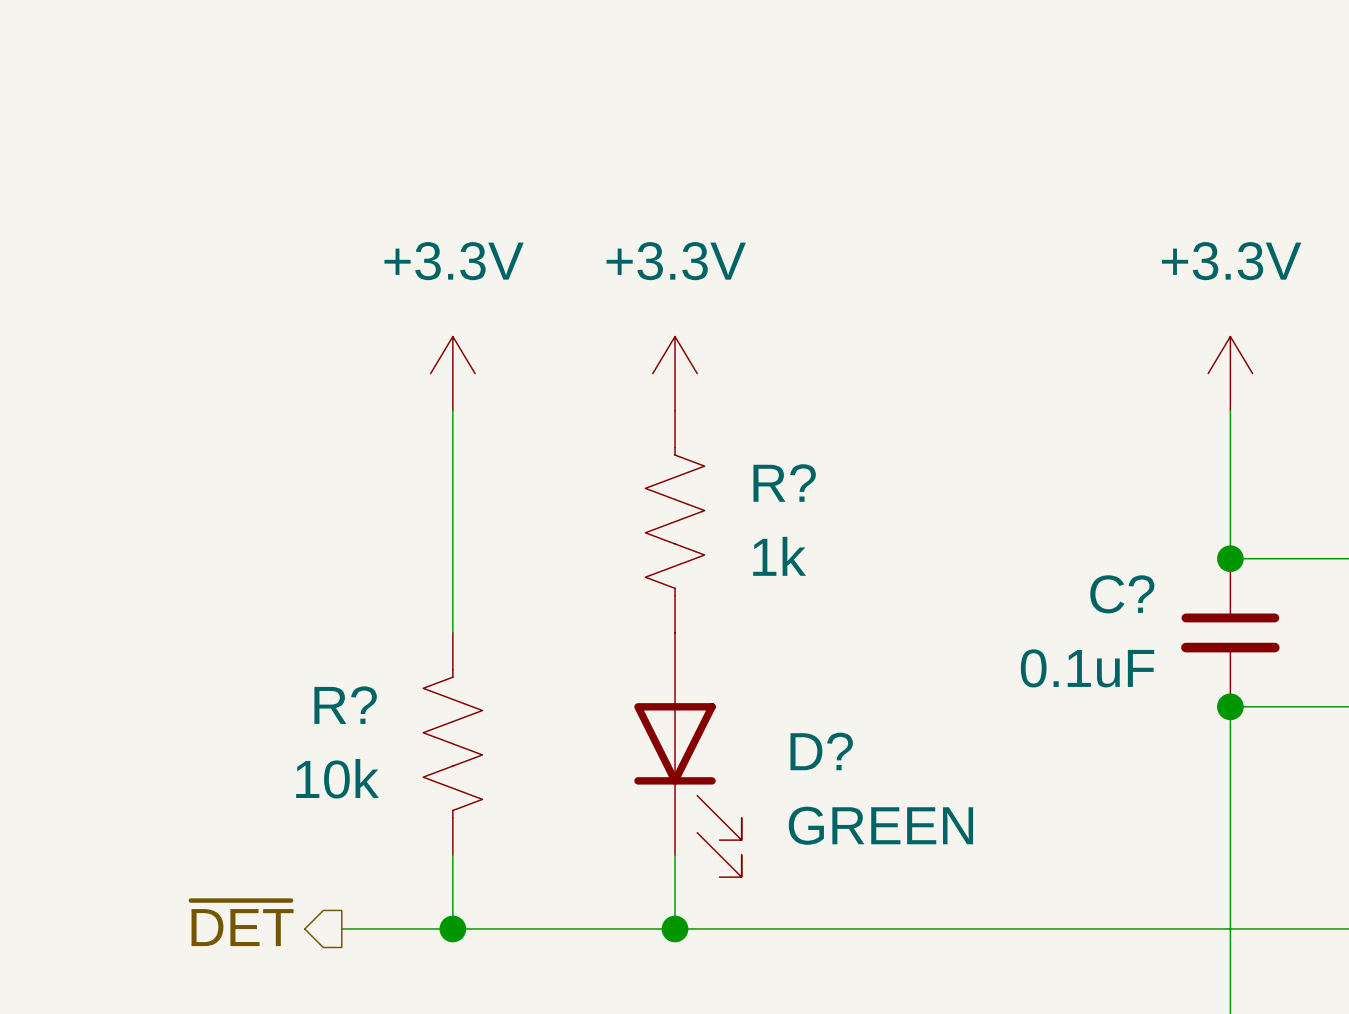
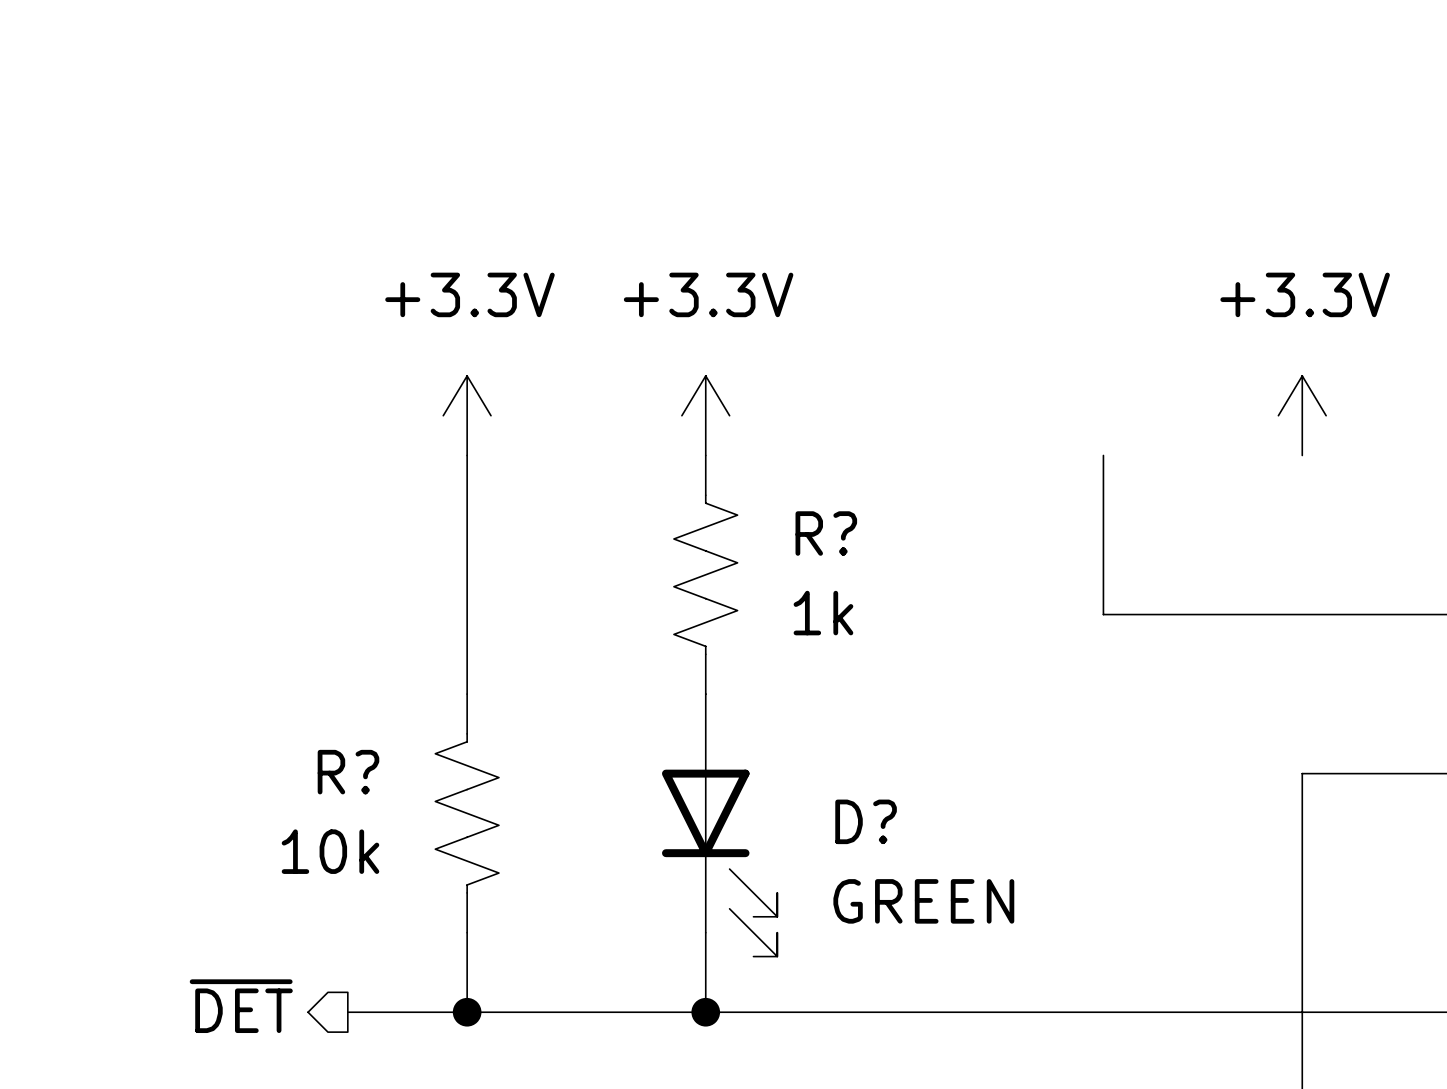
wire: (1230, 410) (1230, 558) -> (1103, 455) (1103, 614) (1302, 614)
junction: (1230, 558) -> none
C?: 0.1uF (1230, 632) -> none
junction: (1230, 706) -> none

